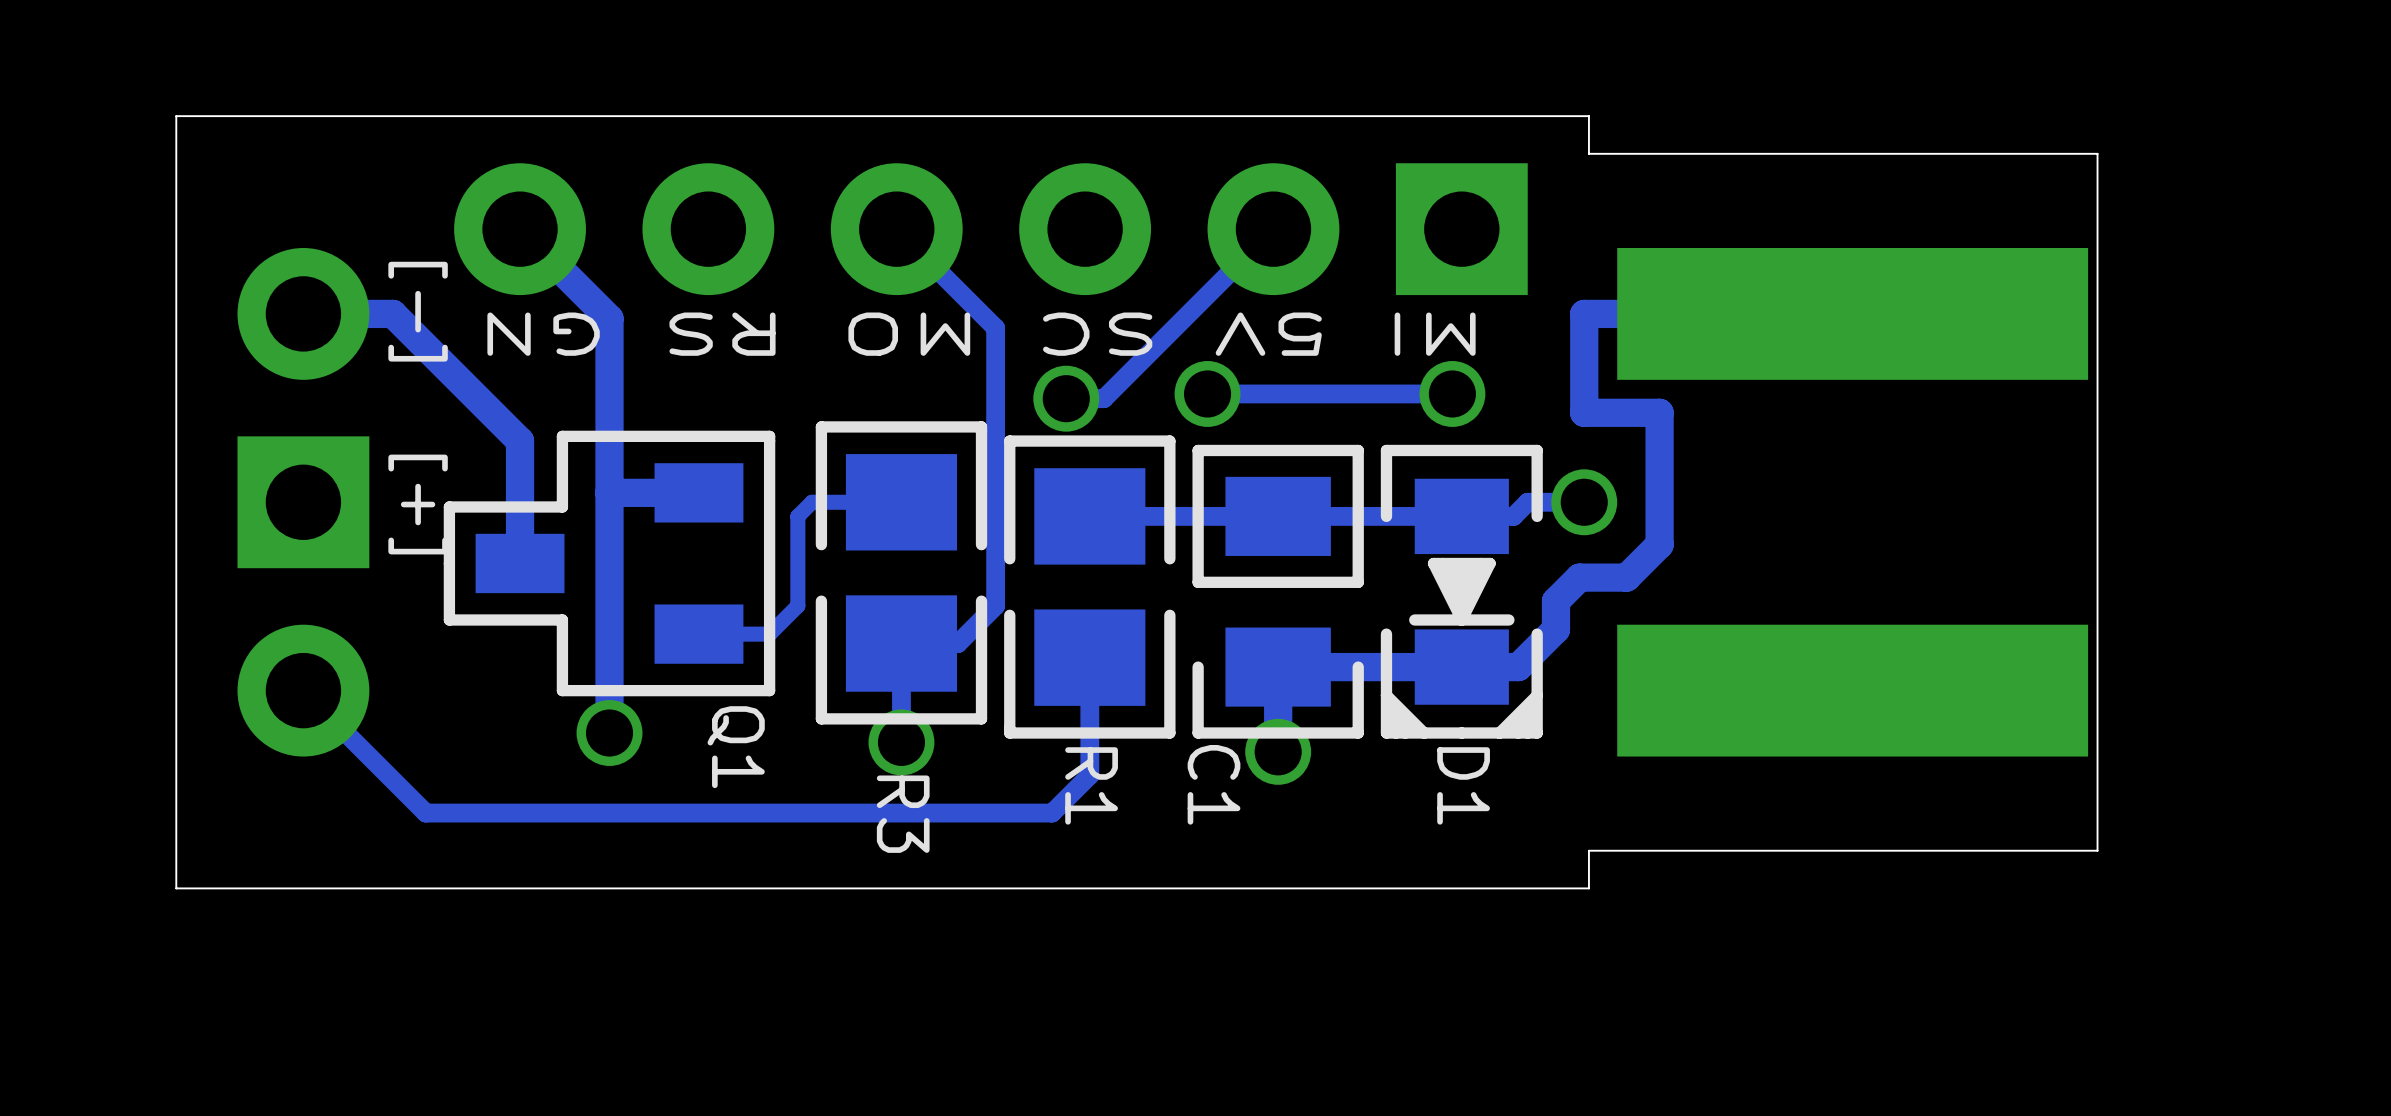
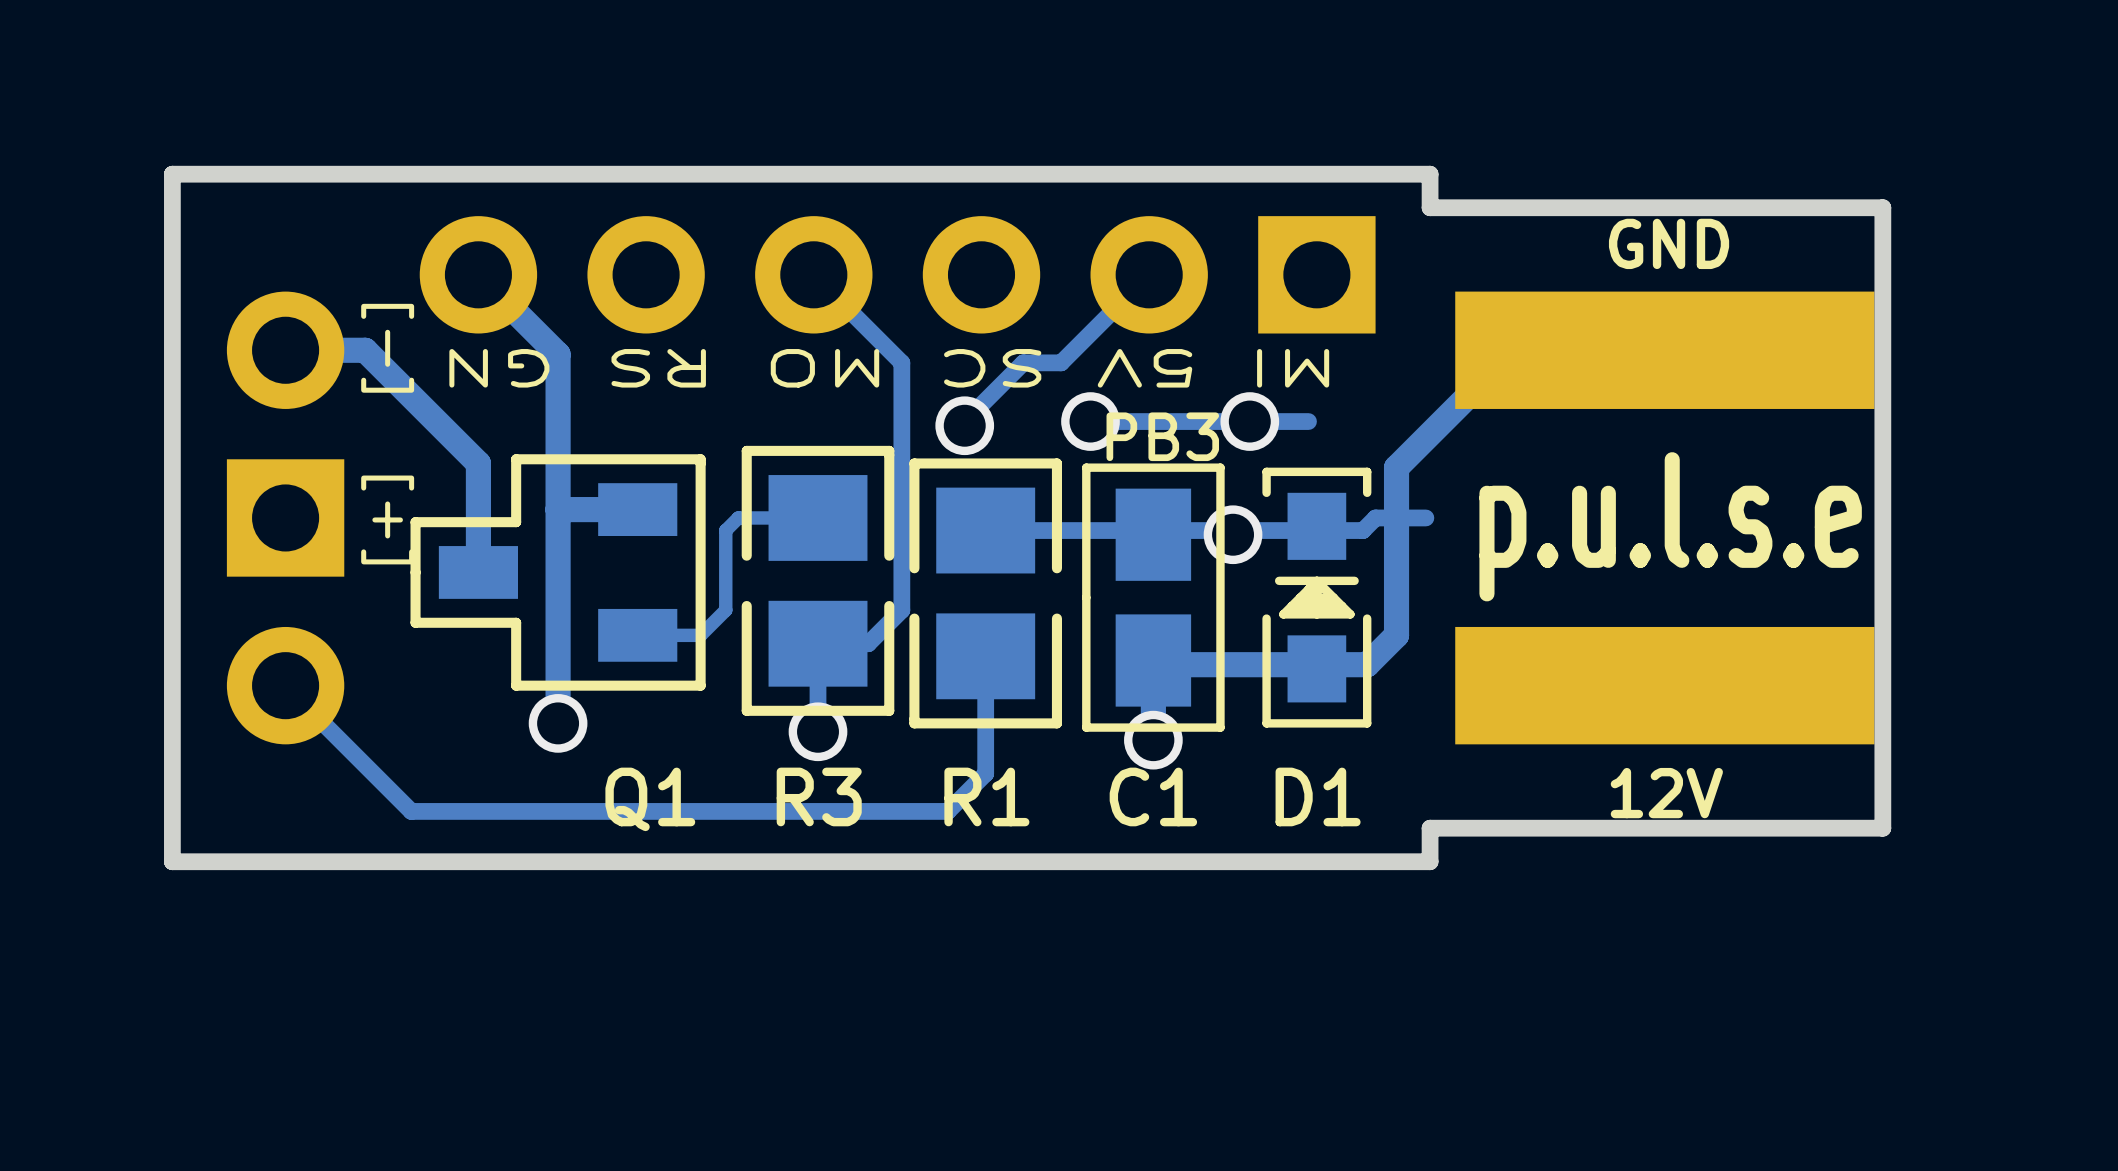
board edge width: thin (1588, 116) (1588, 153) (2097, 153) (2097, 850) (1588, 850) (1588, 888) (176, 888) (176, 116) (1588, 116) -> thick (1430, 174) (1430, 207) (1882, 207) (1882, 828) (1430, 828) (1430, 861) (172, 861) (172, 174) (1430, 174)
text: none -> GND (1669, 243)
track: (1683, 313) (1584, 313) (1584, 412) (1659, 412) (1659, 544) (1626, 577) (1579, 577) (1556, 601) (1556, 629) (1551, 634) -> (1513, 350) (1396, 467) (1396, 635)
track: (1174, 328) (1103, 398) (1066, 398) -> (1061, 362) (1023, 362) (960, 425)
via position: (1452, 393) -> (1249, 421)
text: none -> PB3 (1162, 436)
C1 footprint: [1192, 444, 1364, 739] -> [1082, 463, 1225, 732]
D1 footprint: [1380, 444, 1543, 739] -> [1262, 467, 1372, 728]
via: (1584, 502) -> none
text: none -> p.u.l.s.e (1670, 526)
via: none -> (1233, 534)
Q1 name rotation: 0° (736, 747) -> 90° counterclockwise (650, 799)
track: (1089, 775) (1052, 813) (425, 813) -> (985, 761) (985, 773) (947, 811) (411, 811) (394, 794)
R1 name rotation: 0° (1091, 785) -> 90° counterclockwise (986, 796)
D1 name rotation: 0° (1463, 785) -> 90° counterclockwise (1318, 796)
text: none -> 12V (1666, 793)
R3 name rotation: 0° (903, 814) -> 90° counterclockwise (819, 796)

